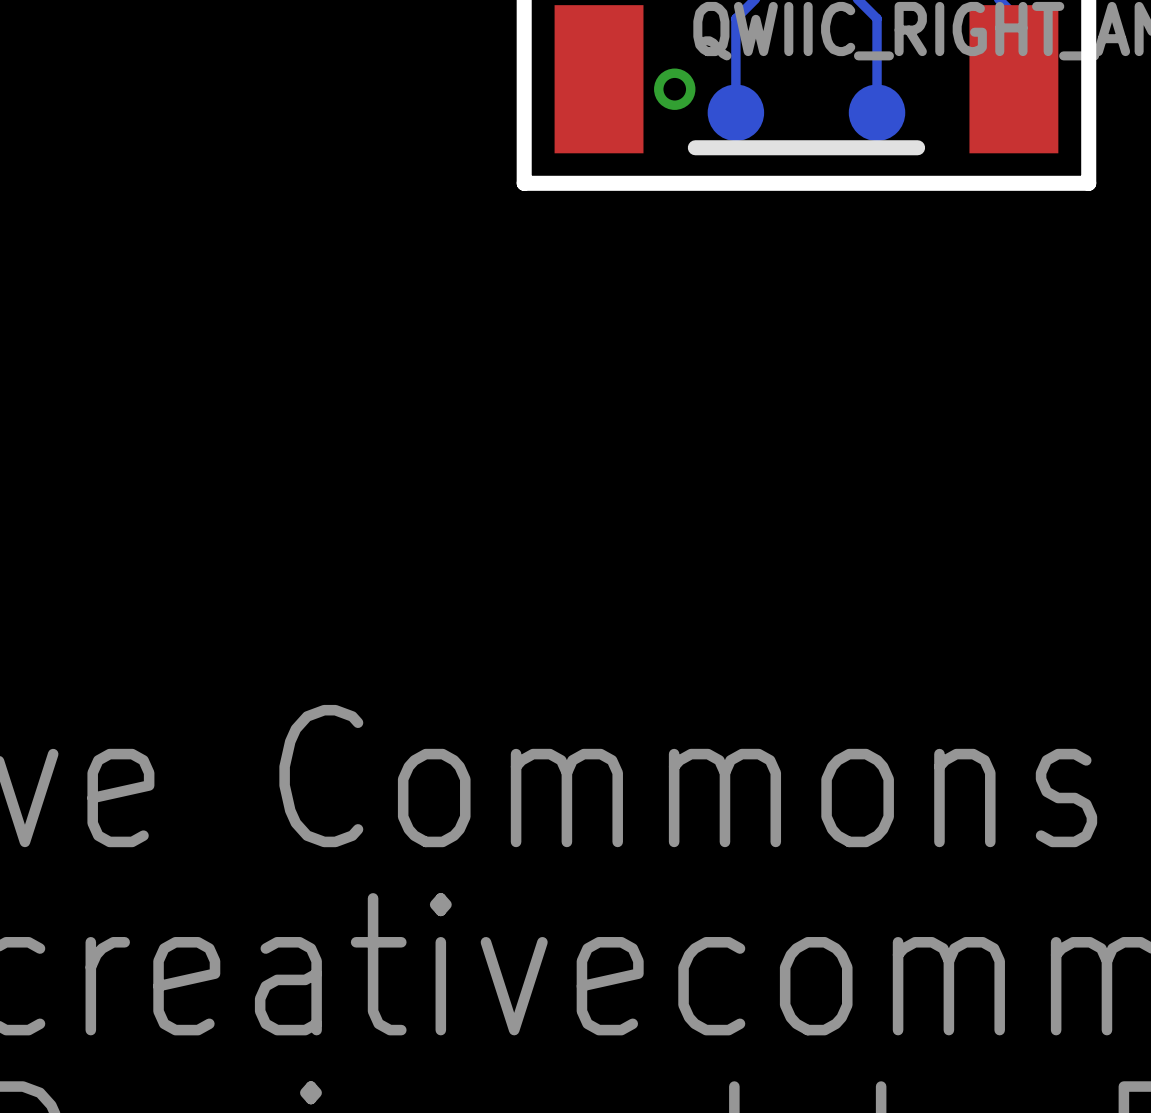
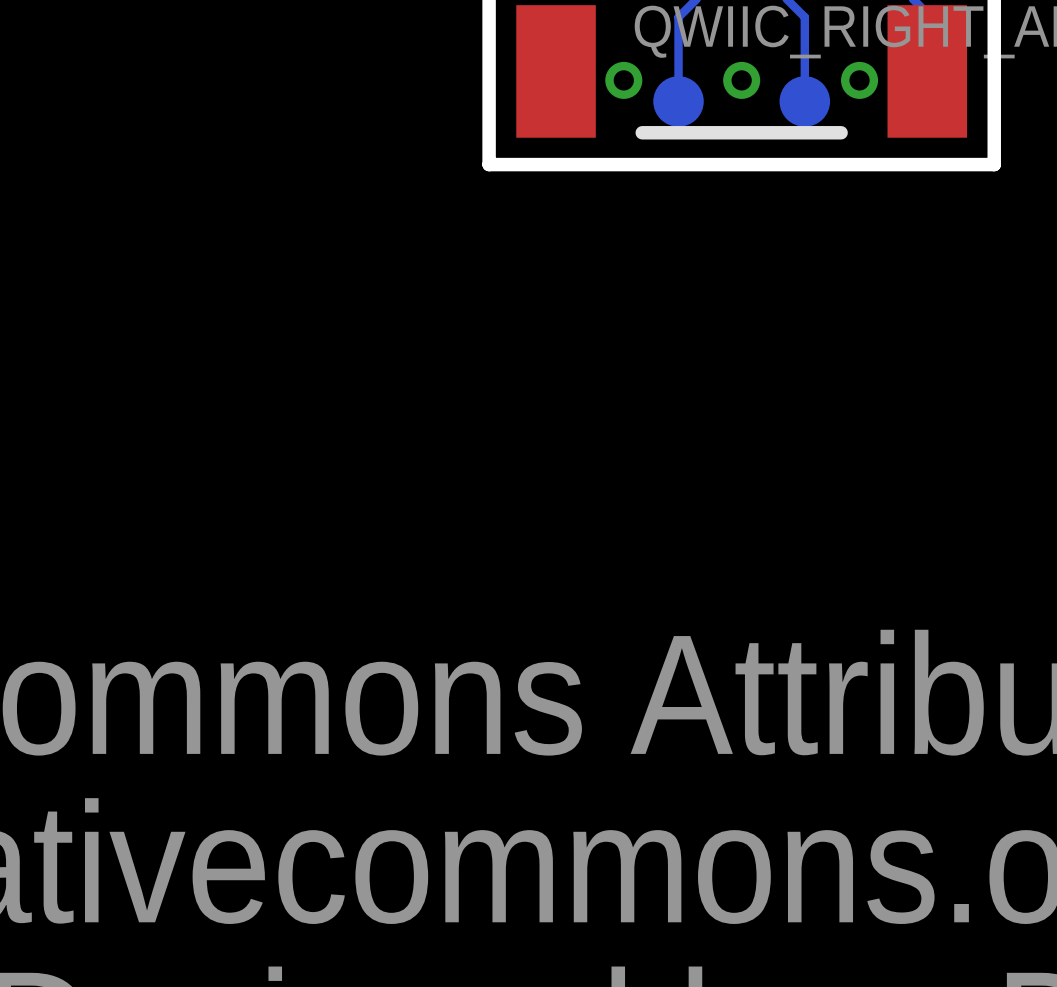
via: none -> (741, 80)
via: none -> (859, 80)

